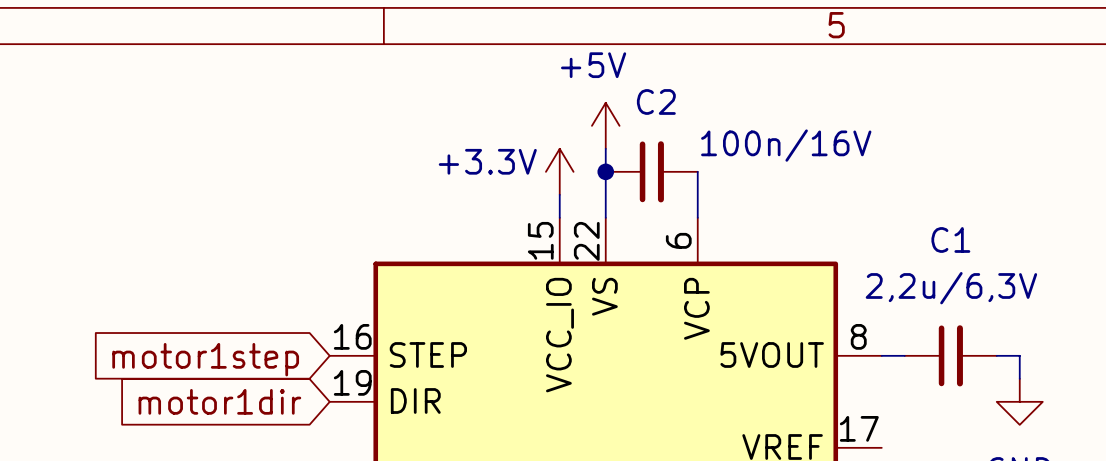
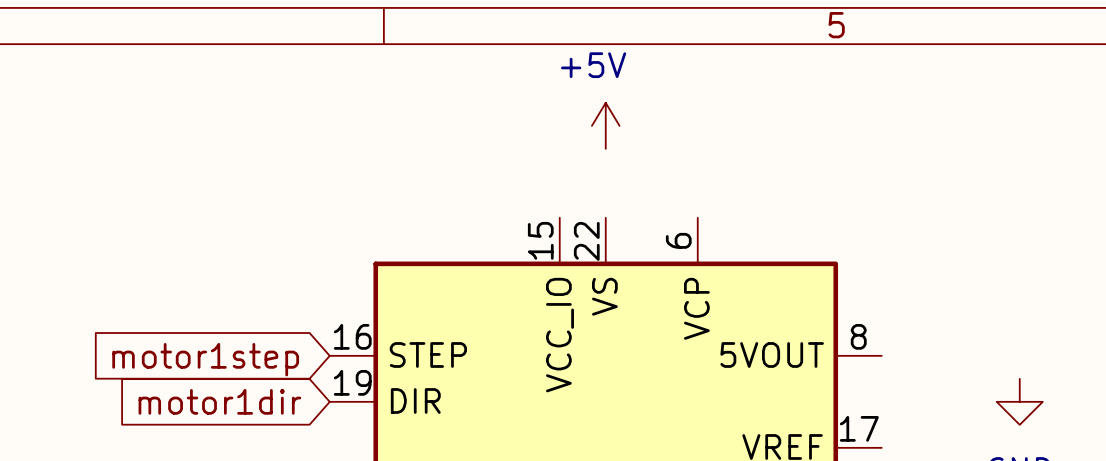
wire: (605, 148) (605, 217) -> none
power symbol: +3.3V (559, 171) -> none
junction: (605, 171) -> none
C2: 100n/16V (651, 171) -> none
wire: (697, 171) (697, 217) -> none
wire: (559, 194) (559, 217) -> none
wire: (881, 355) (904, 355) -> none
C1: 2,2u/6,3V (950, 355) -> none
wire: (996, 355) (1019, 355) (1019, 378) -> none

